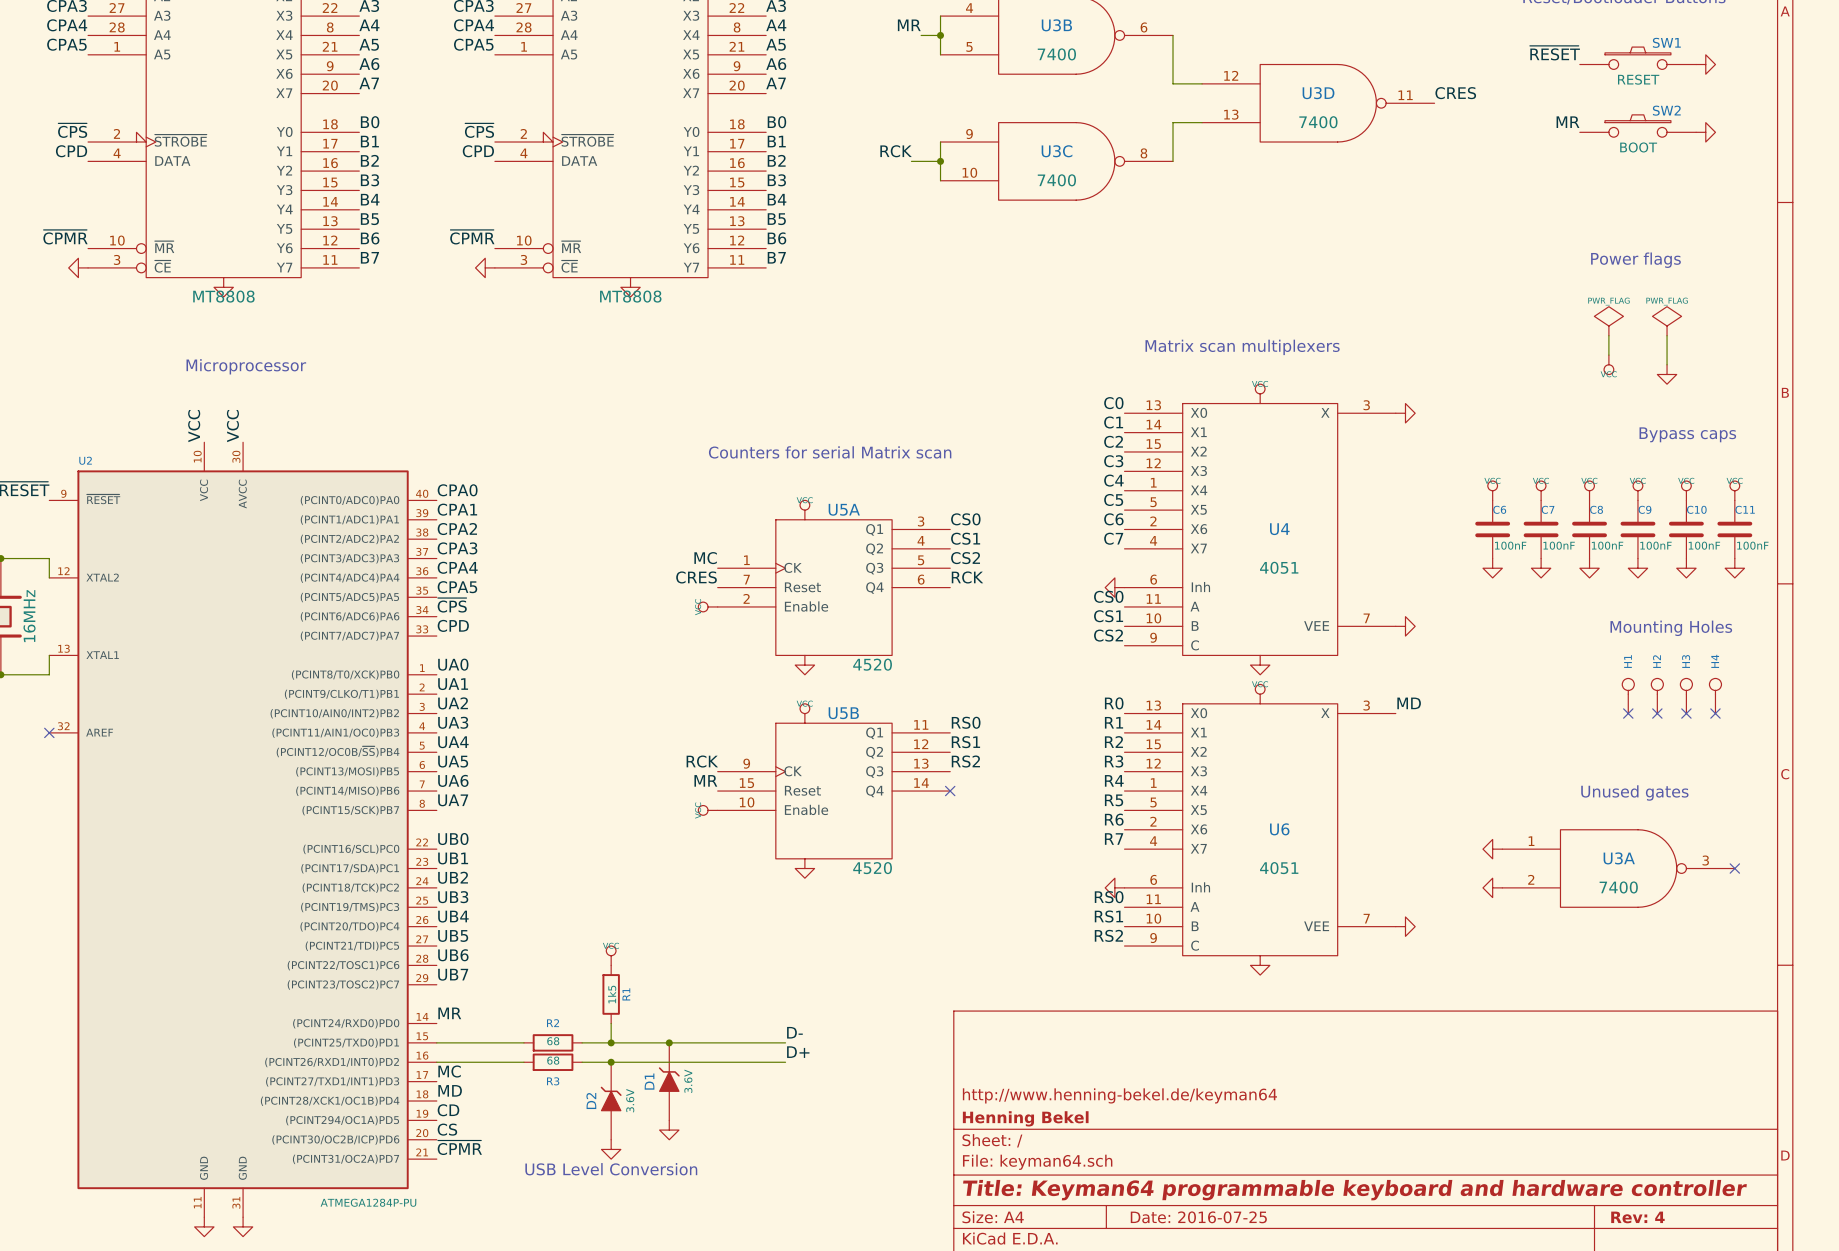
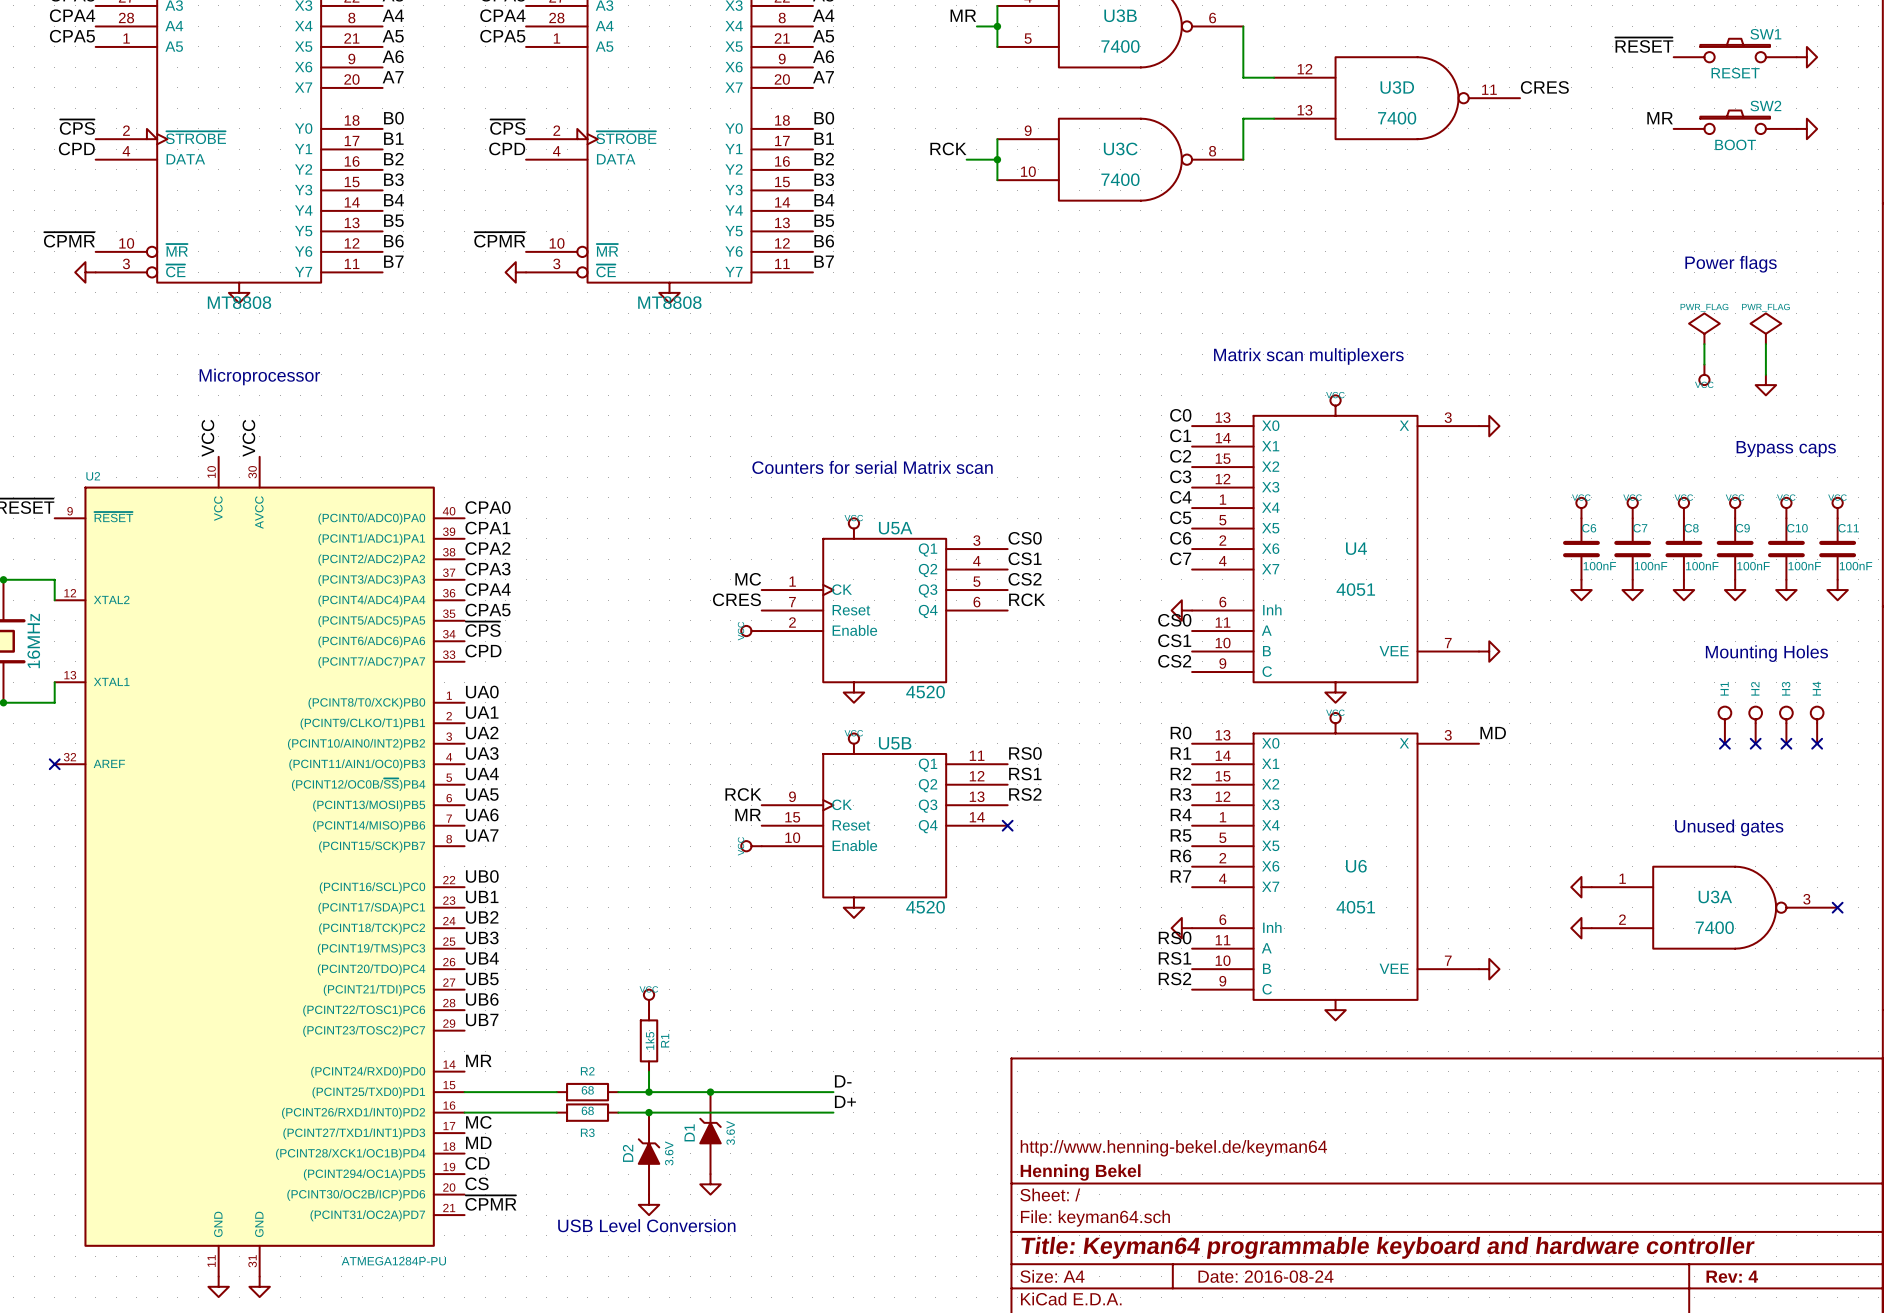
title block: Date: 2016-07-25 (1198, 1217) -> Date: 2016-08-24 (1265, 1276)

